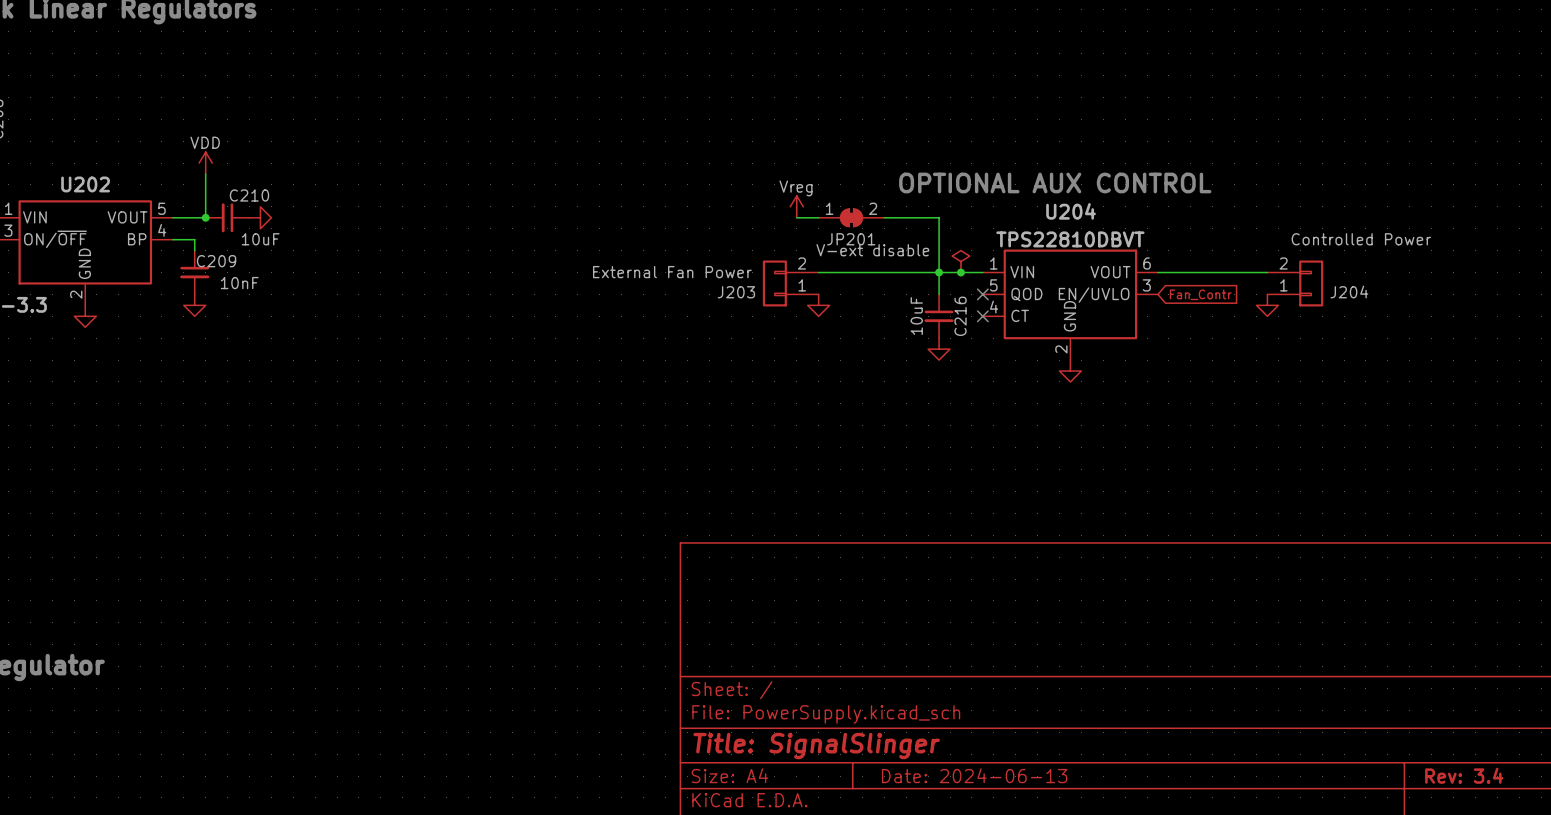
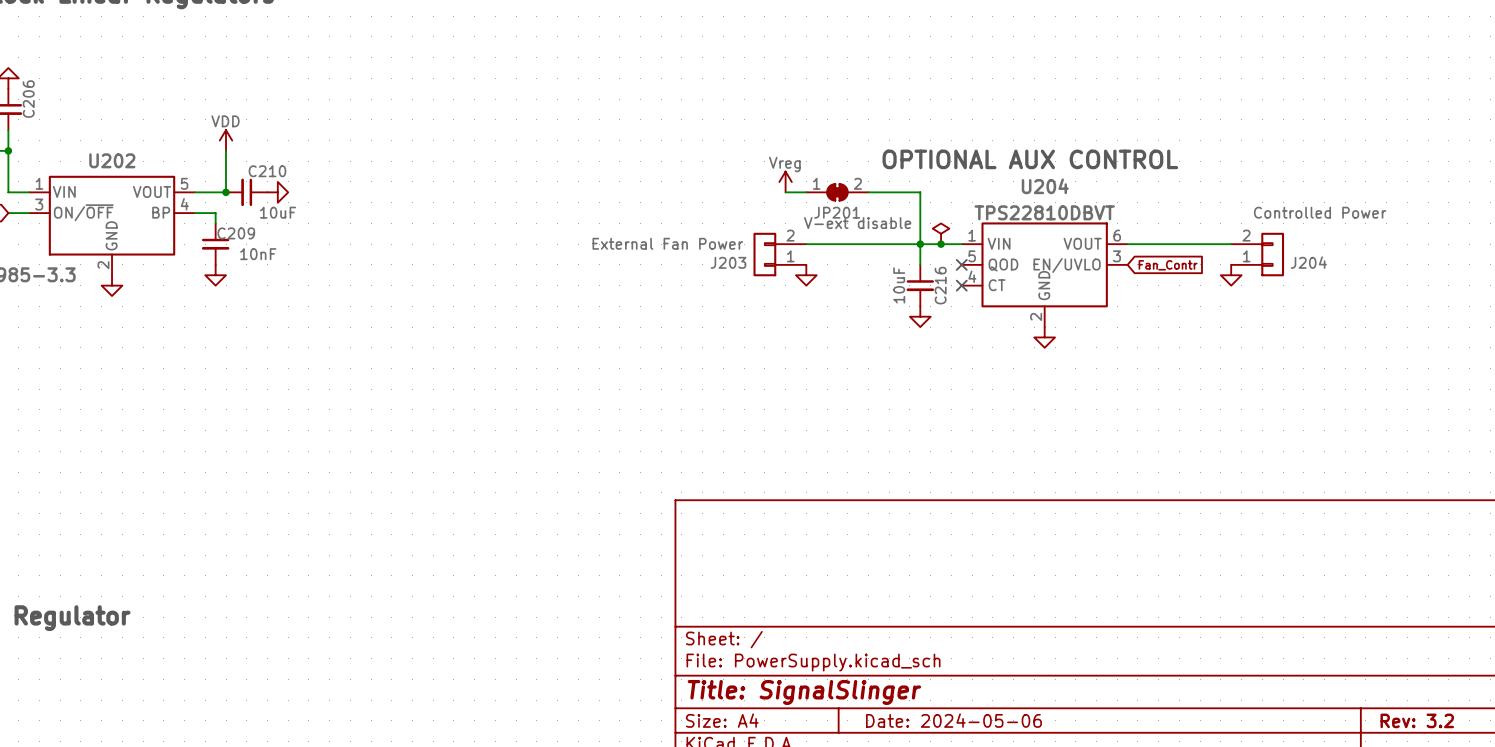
title block: Date: 2024-06-13 (974, 775) -> Date: 2024-05-06 (953, 720)
title block: Rev: 3.4 (1464, 775) -> Rev: 3.2 (1417, 720)

